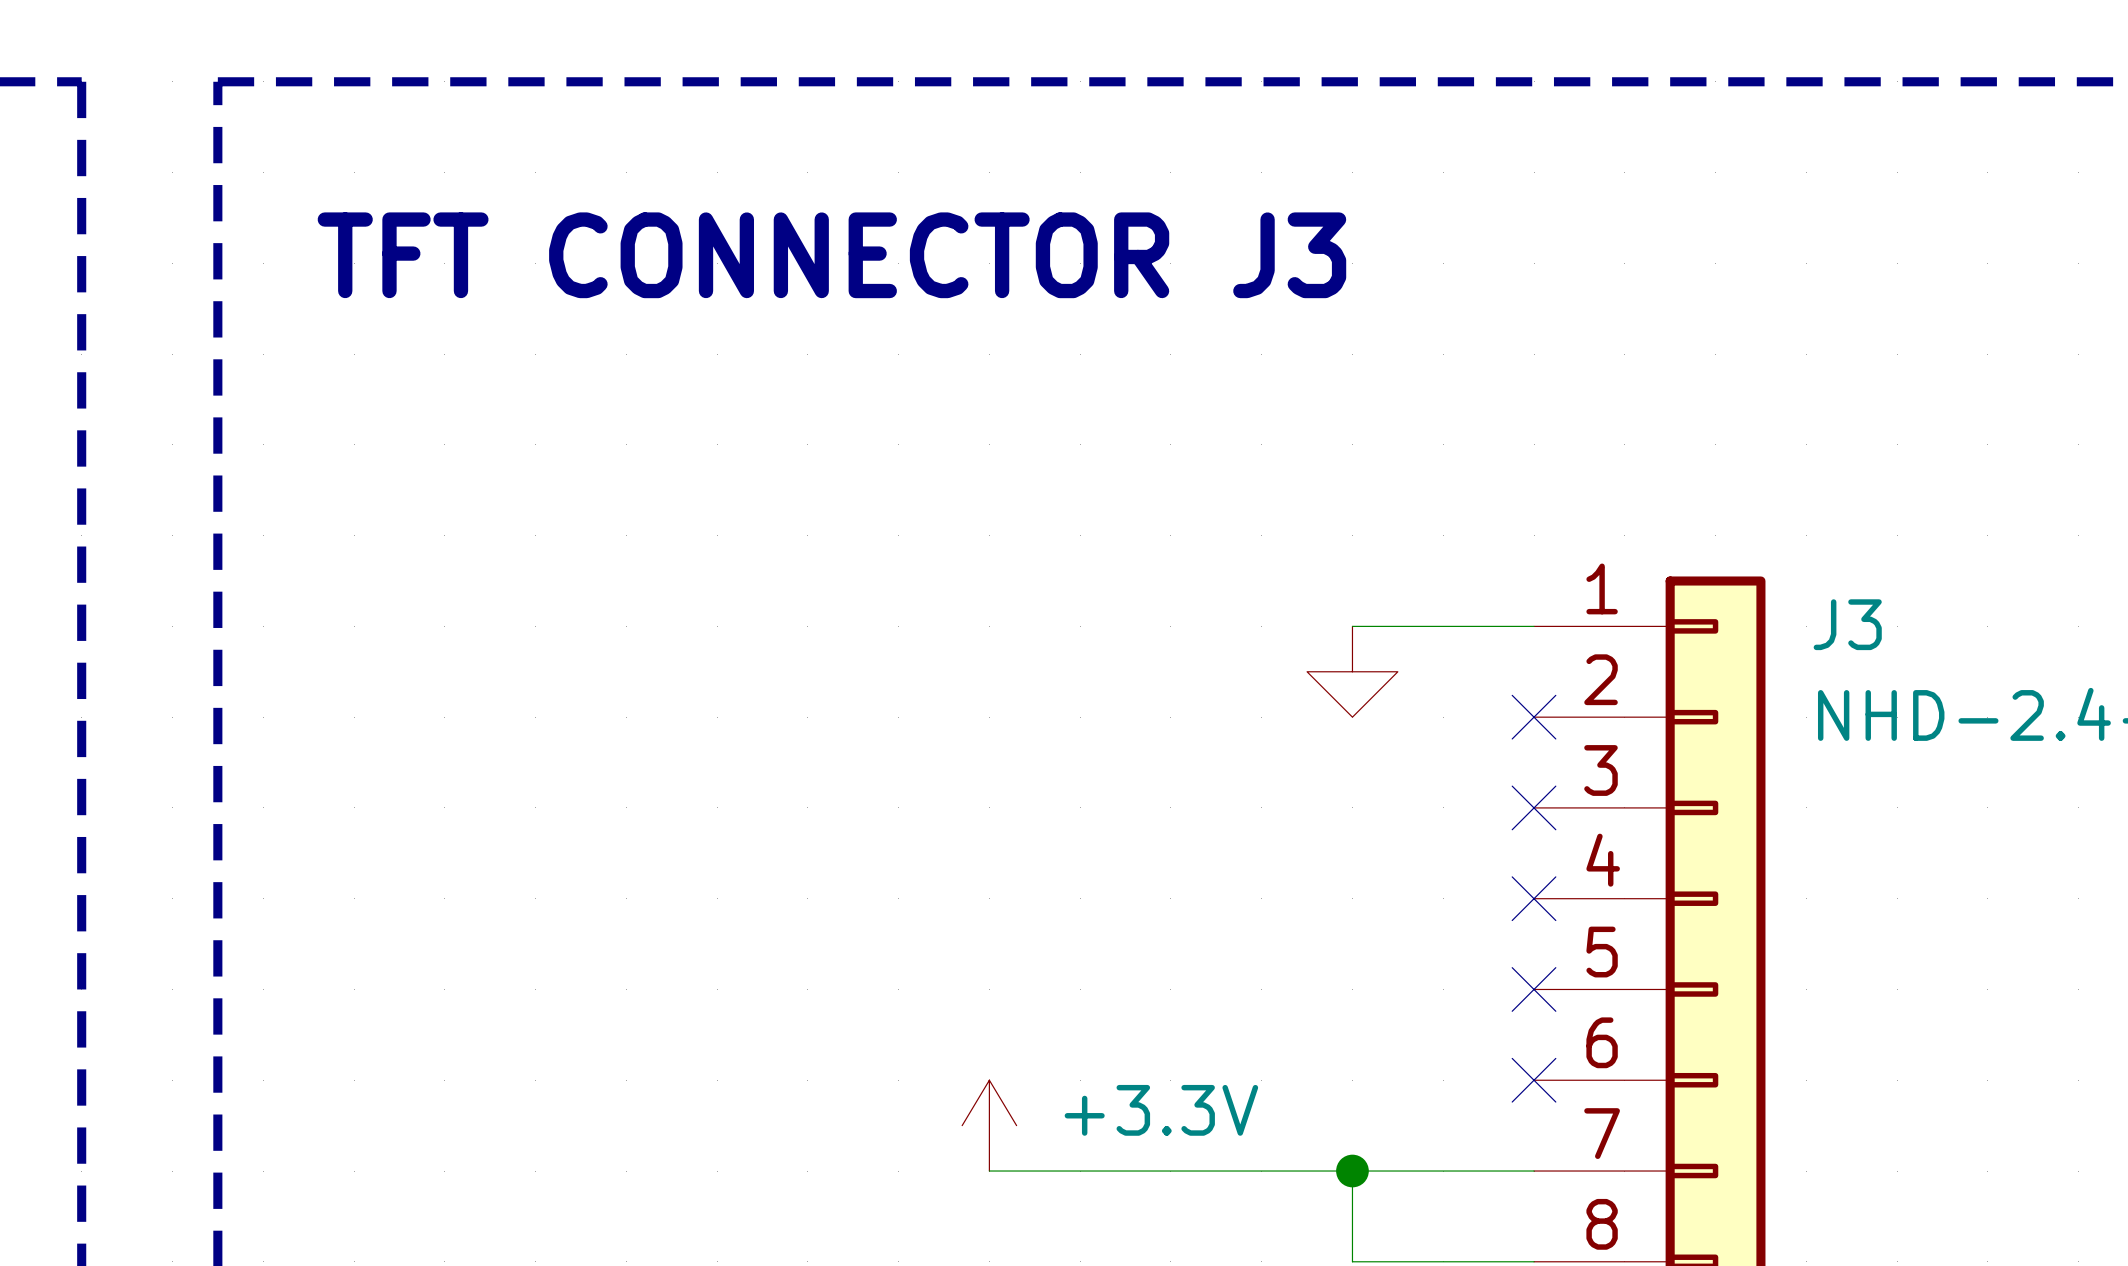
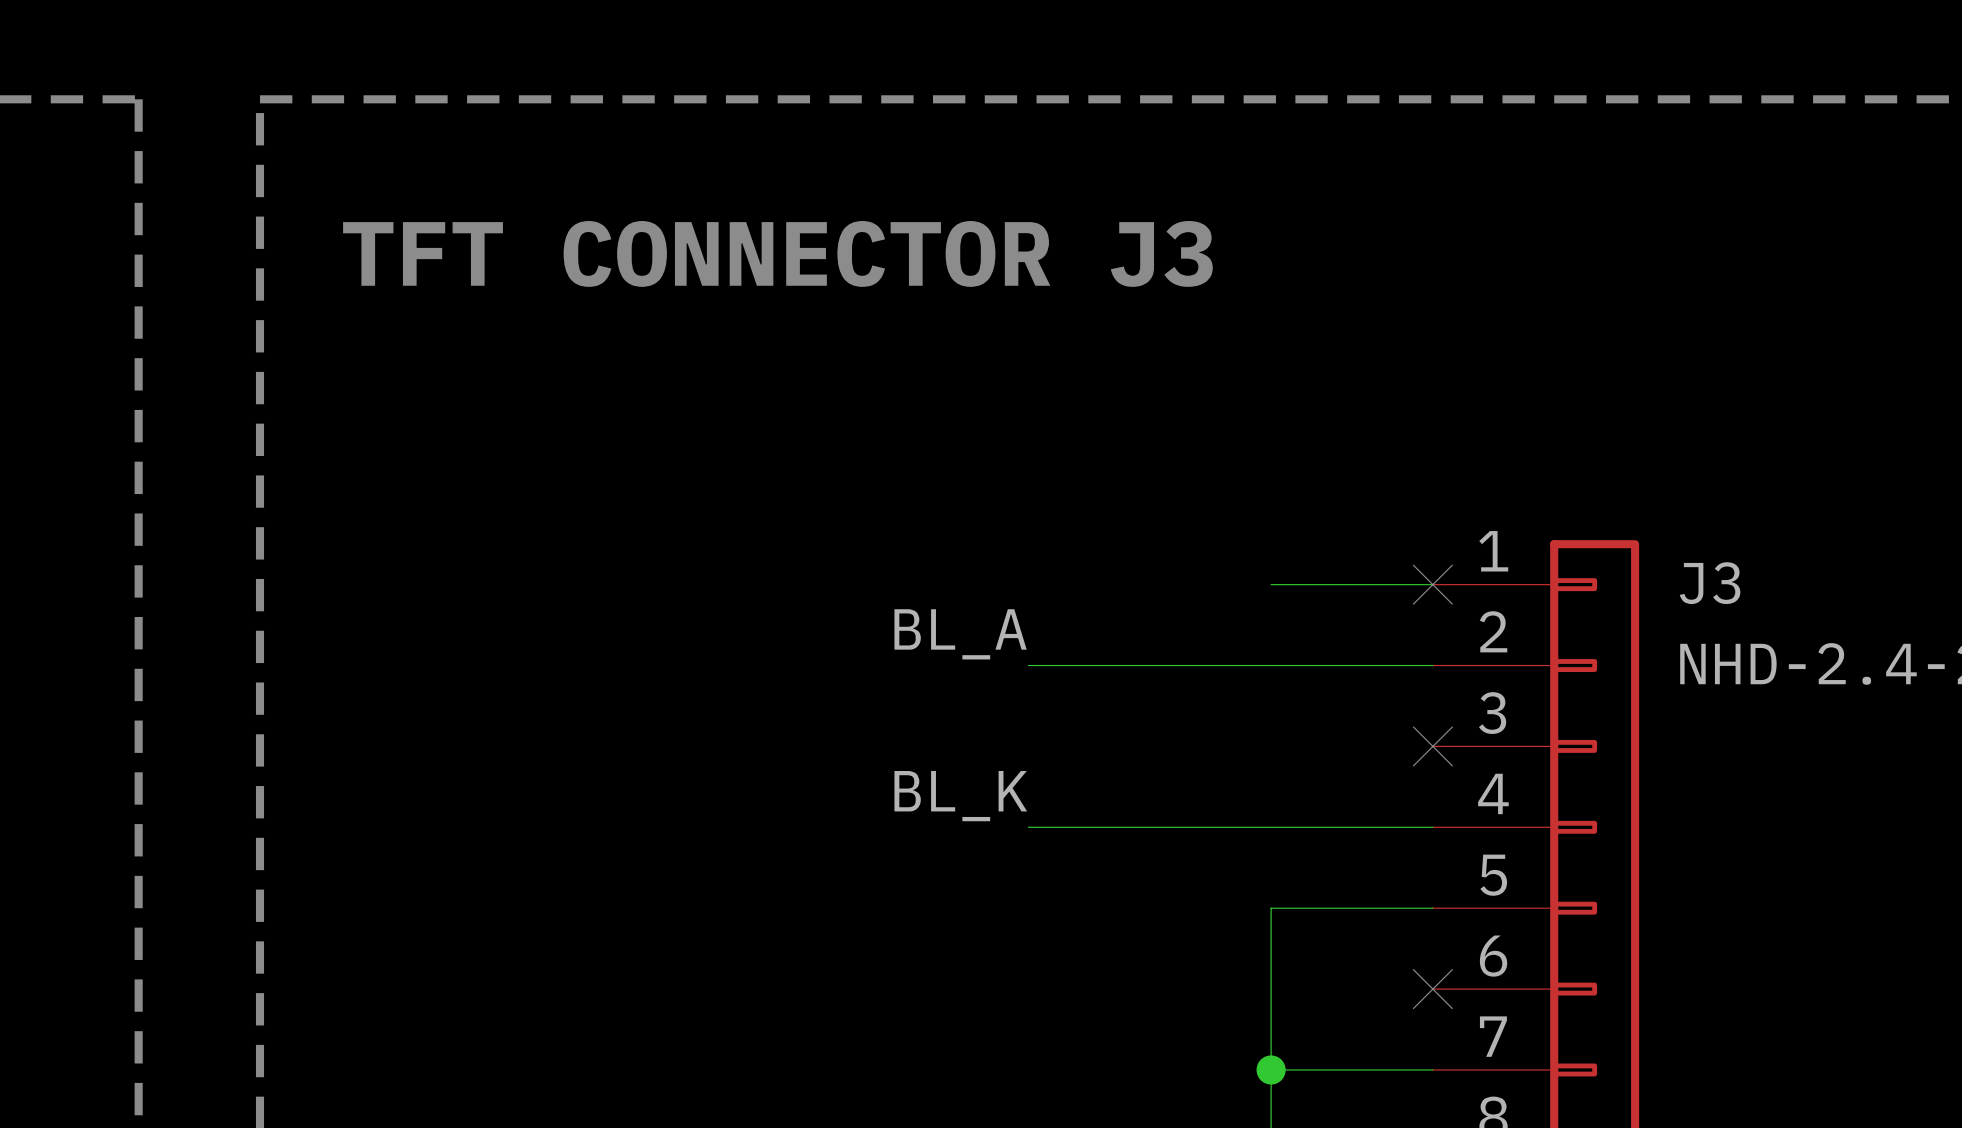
power symbol: (1352, 671) -> none
label: none -> BL_A (960, 634)
wire: none -> (1028, 665) (1432, 665)
no-connect mark position: (1534, 717) -> (1432, 584)
label: none -> BL_K (960, 796)
wire: none -> (1028, 827) (1432, 827)
no-connect mark: (1534, 898) -> none
no-connect mark: (1534, 989) -> none
power symbol: +3.3V (989, 1125) -> none
wire: (989, 1171) (1352, 1171) -> (1432, 908) (1271, 908) (1271, 1069)

